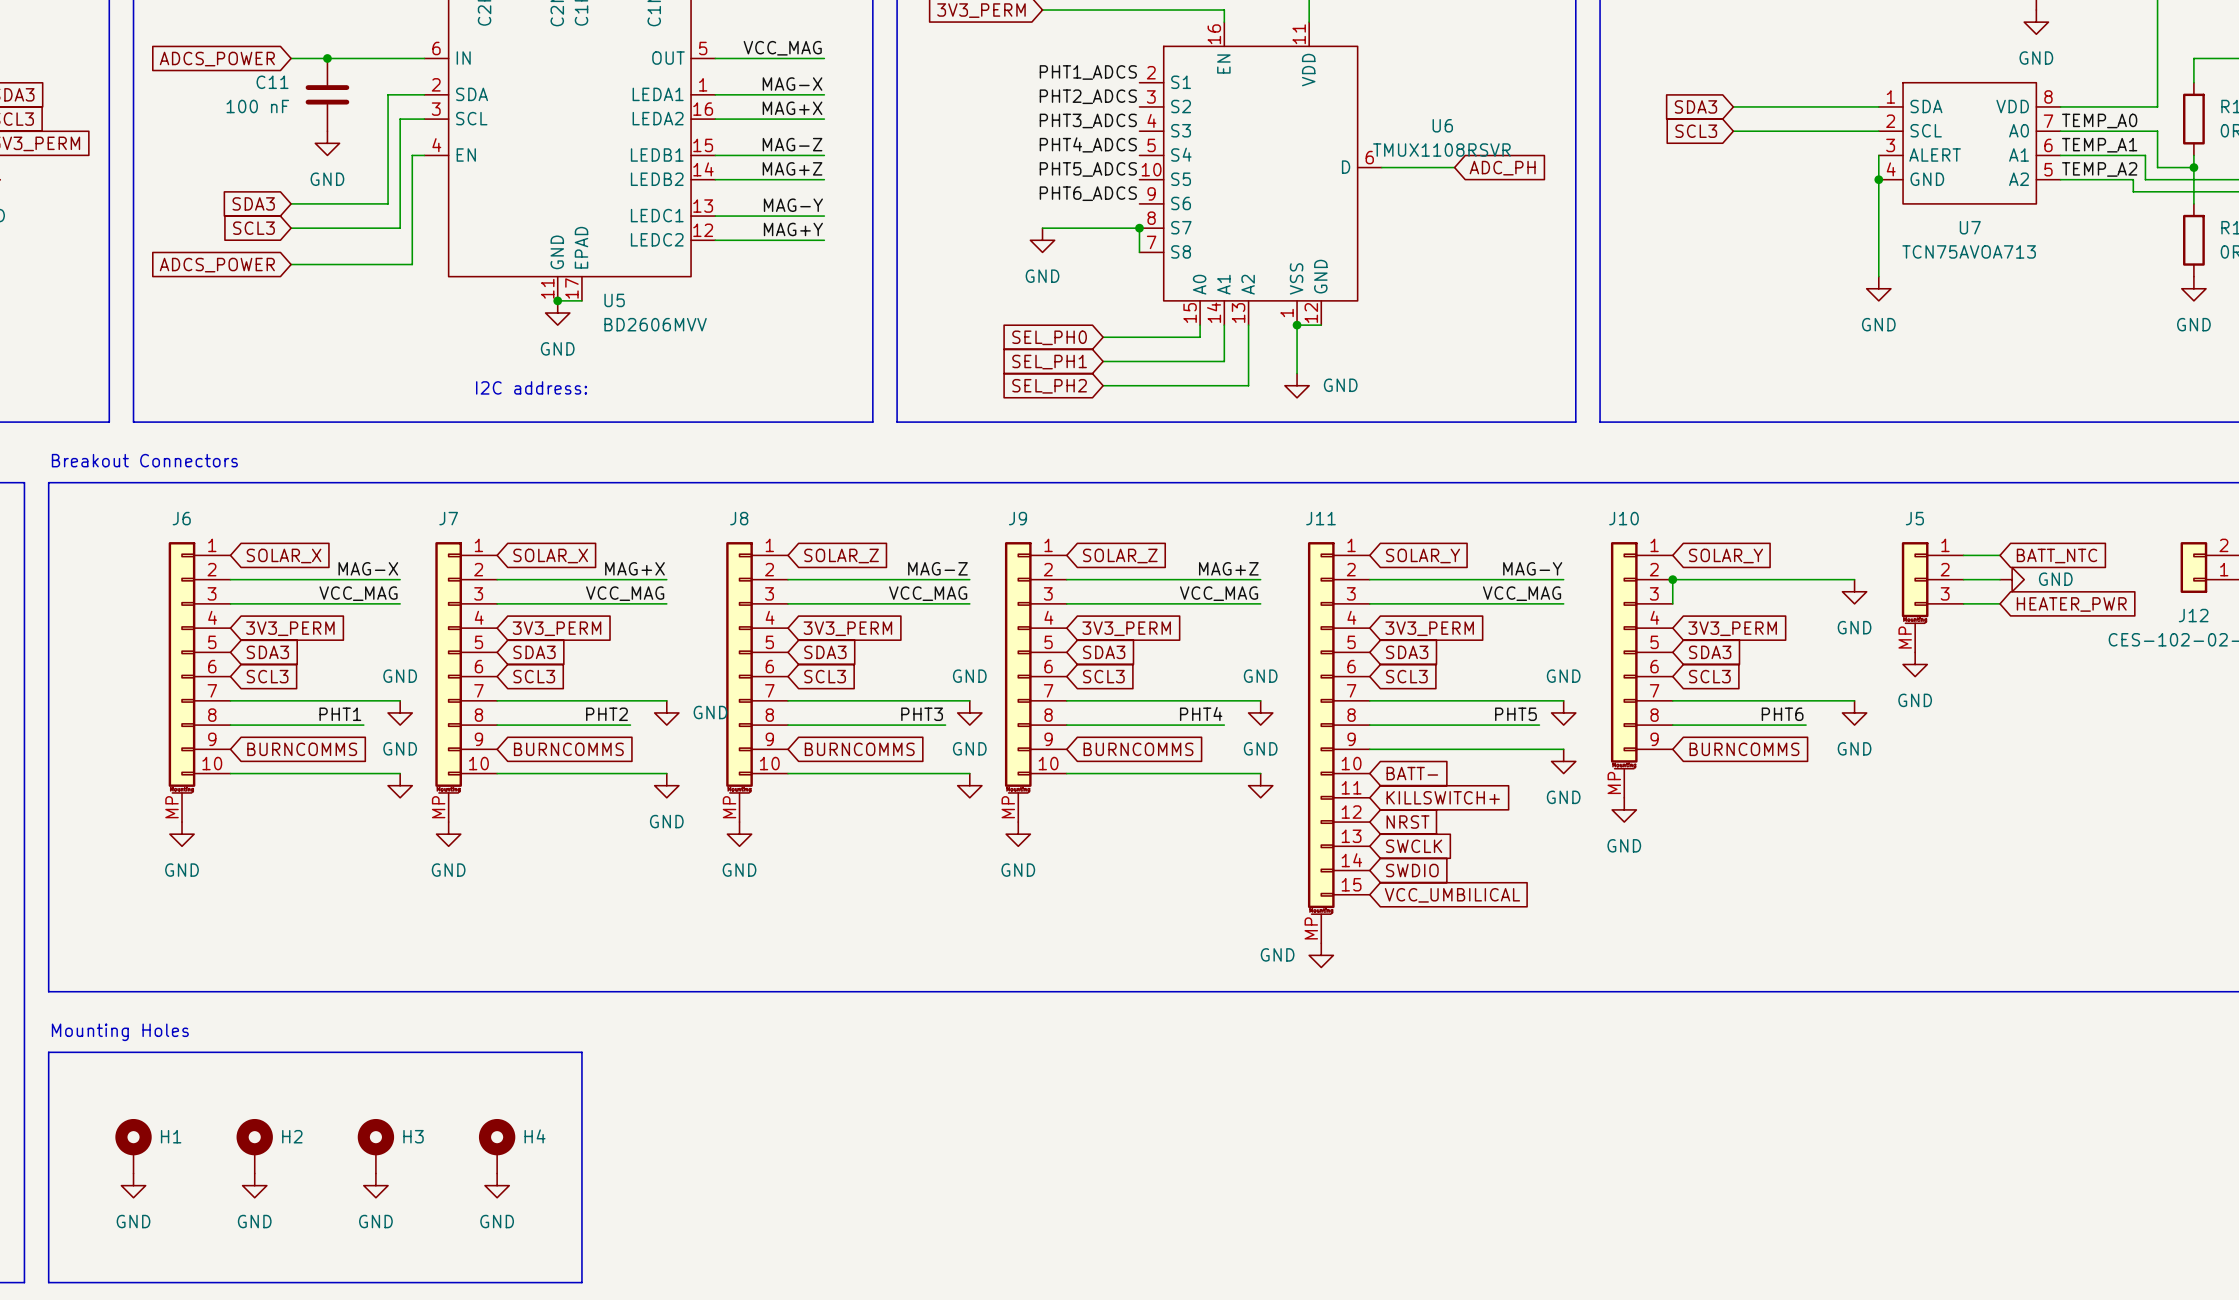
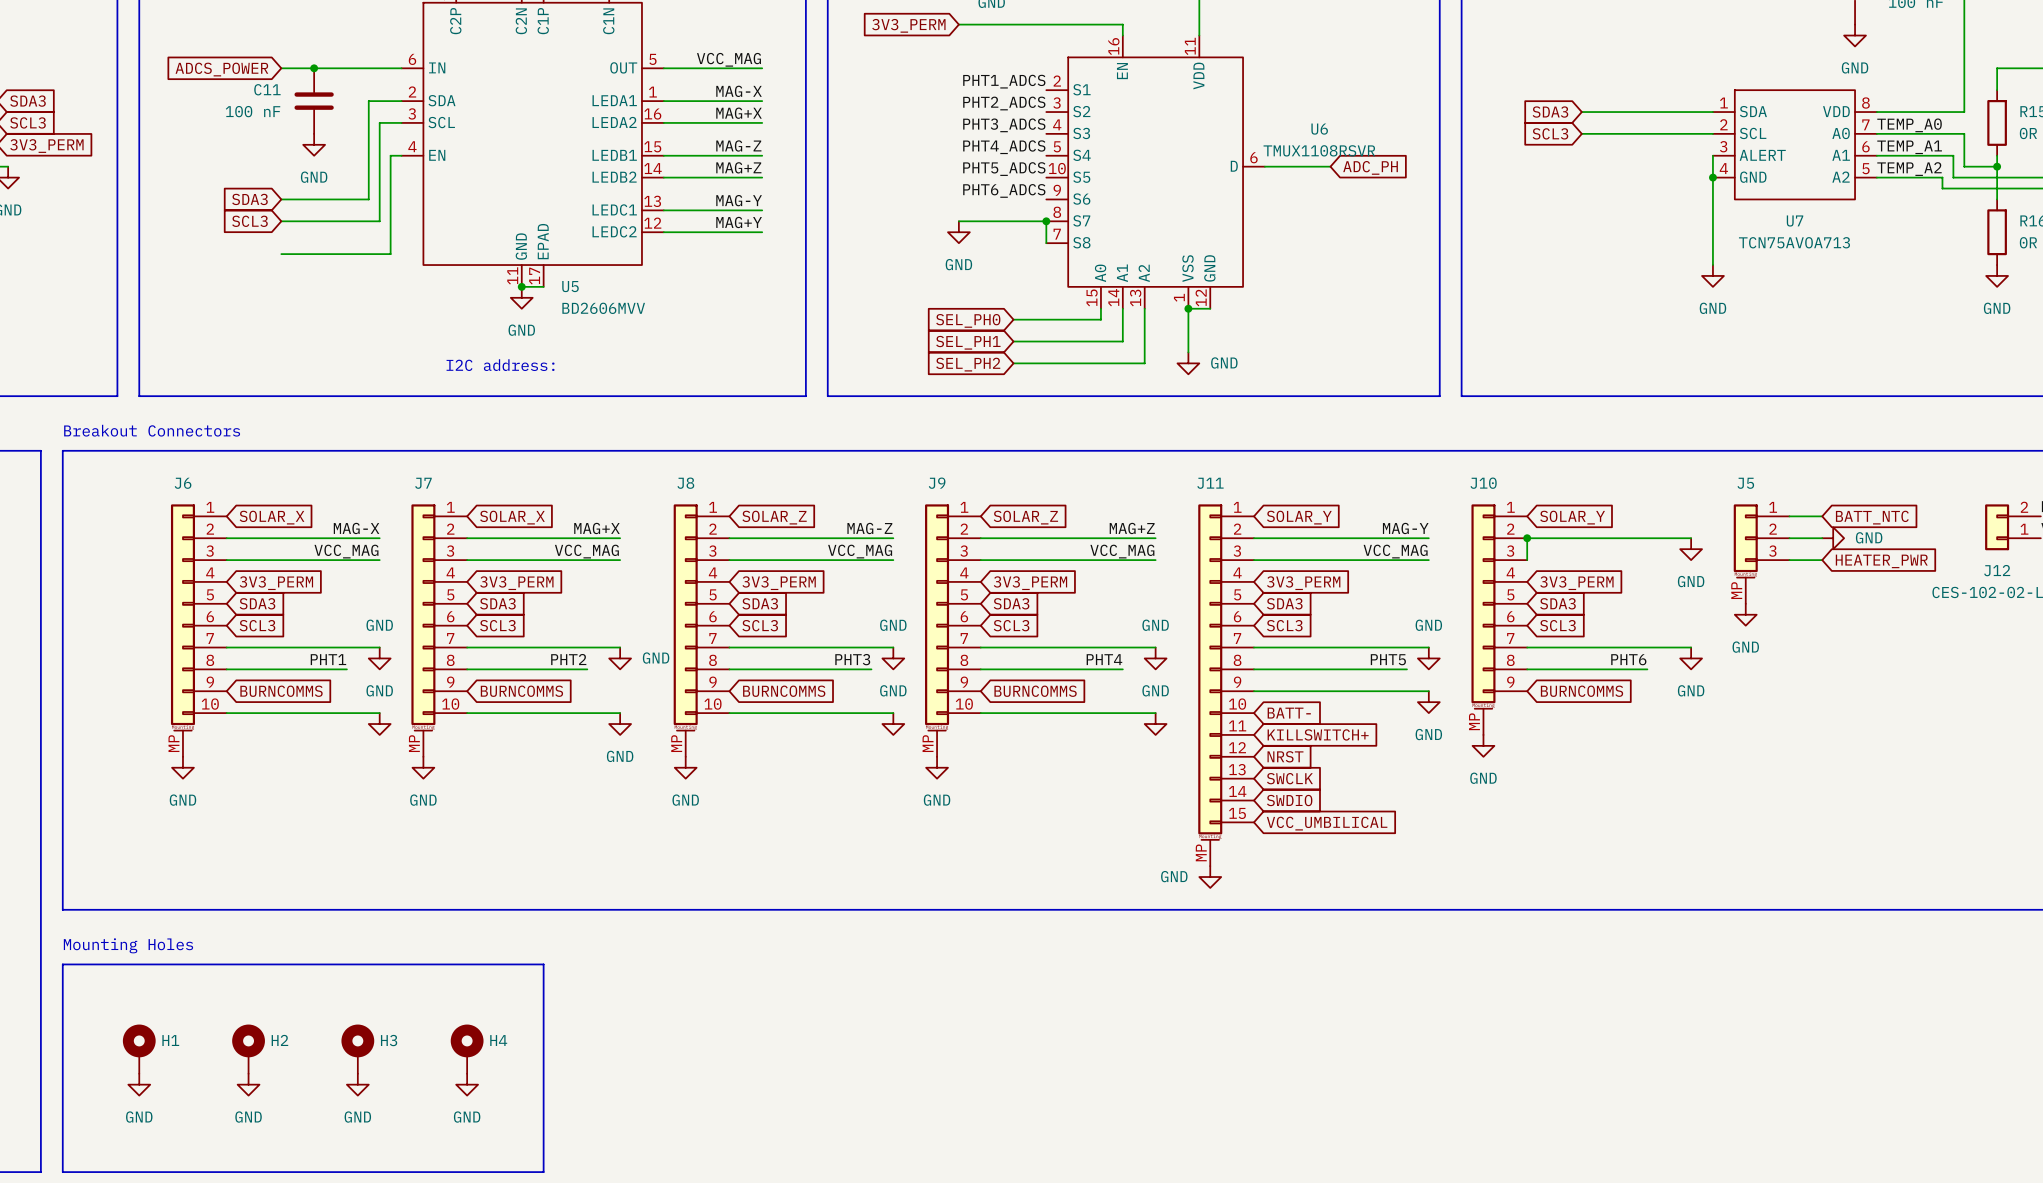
global label: ADCS_POWER (217, 265) -> none

